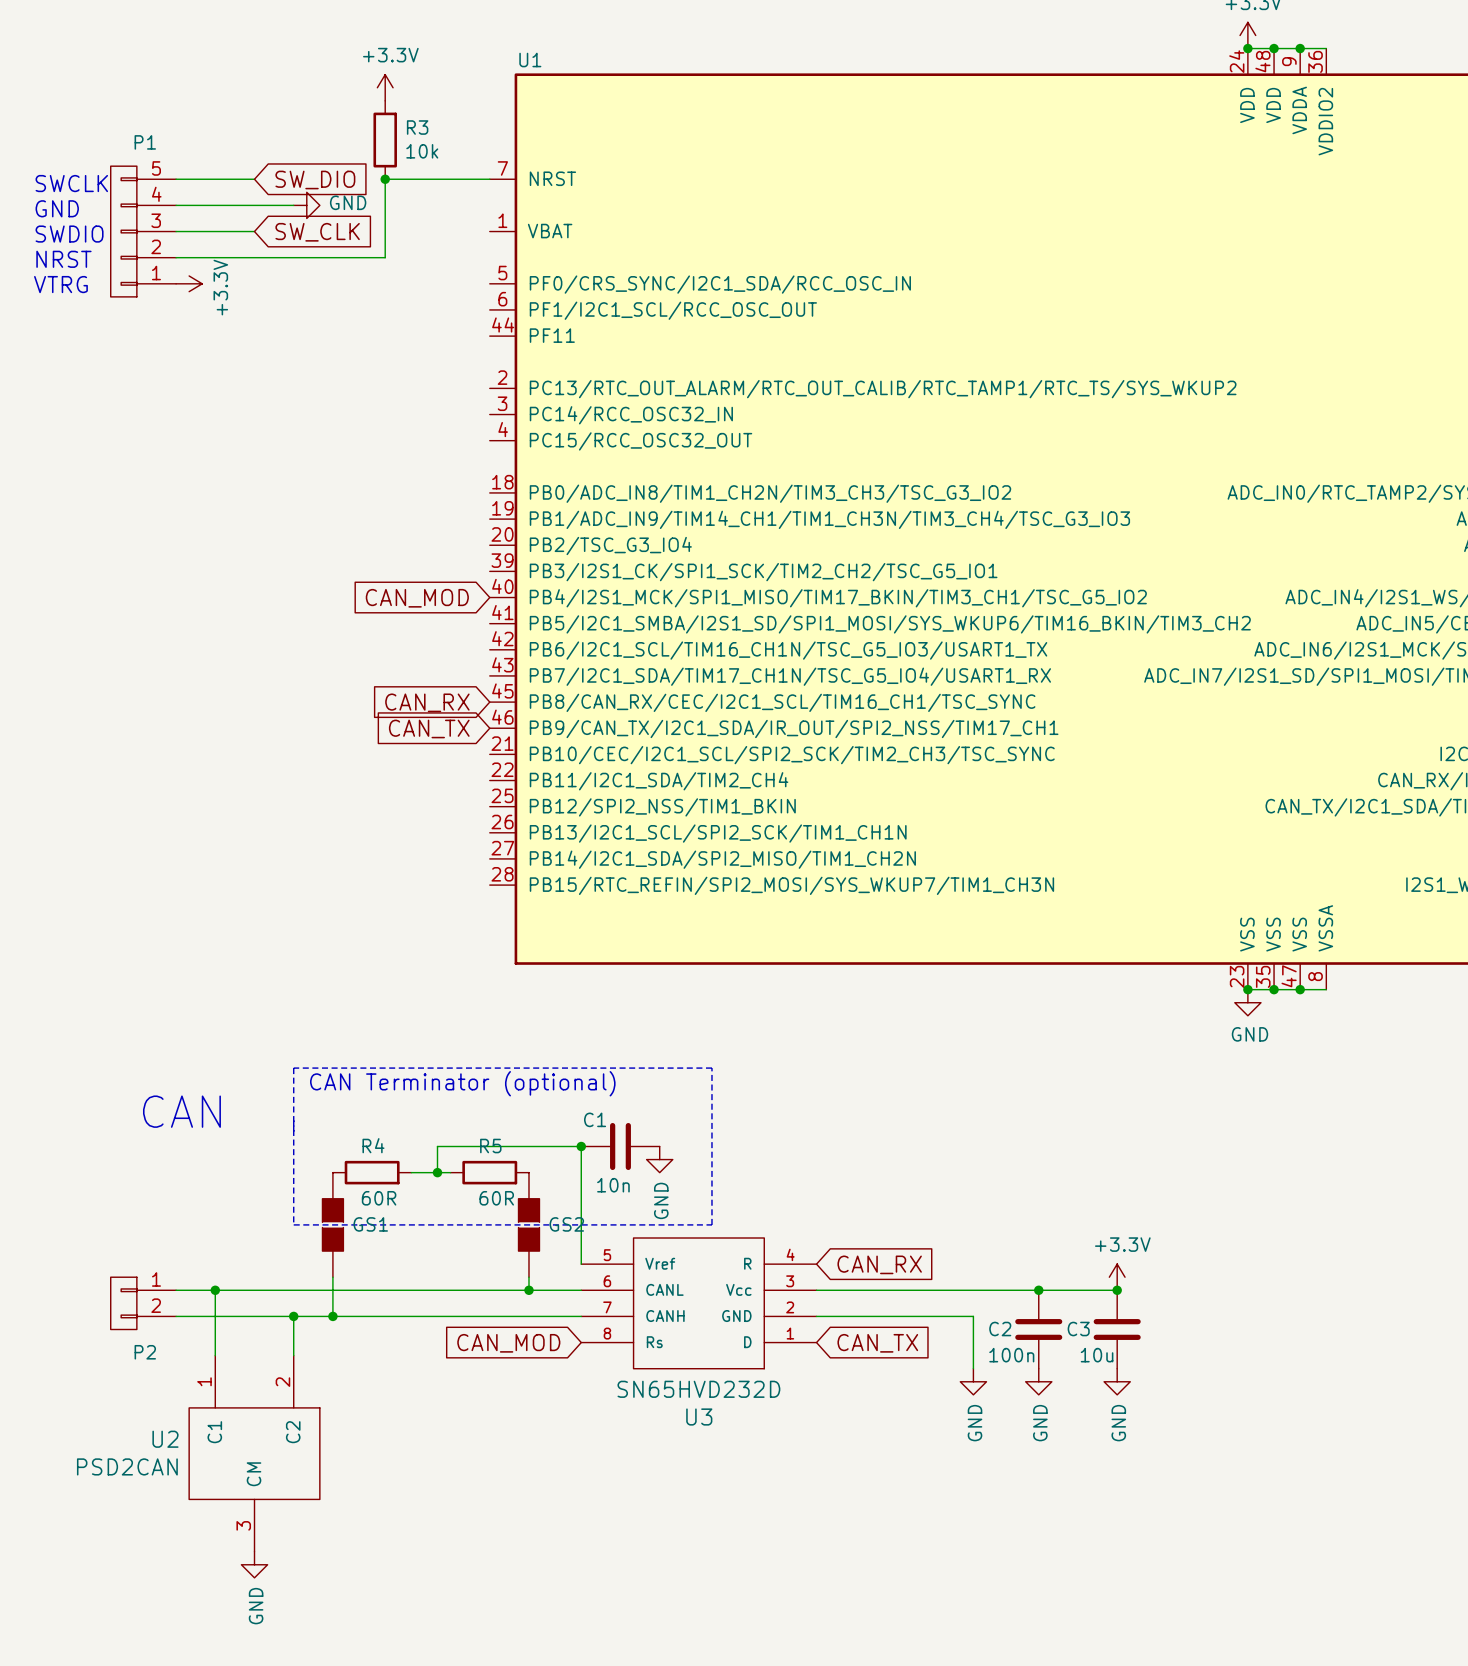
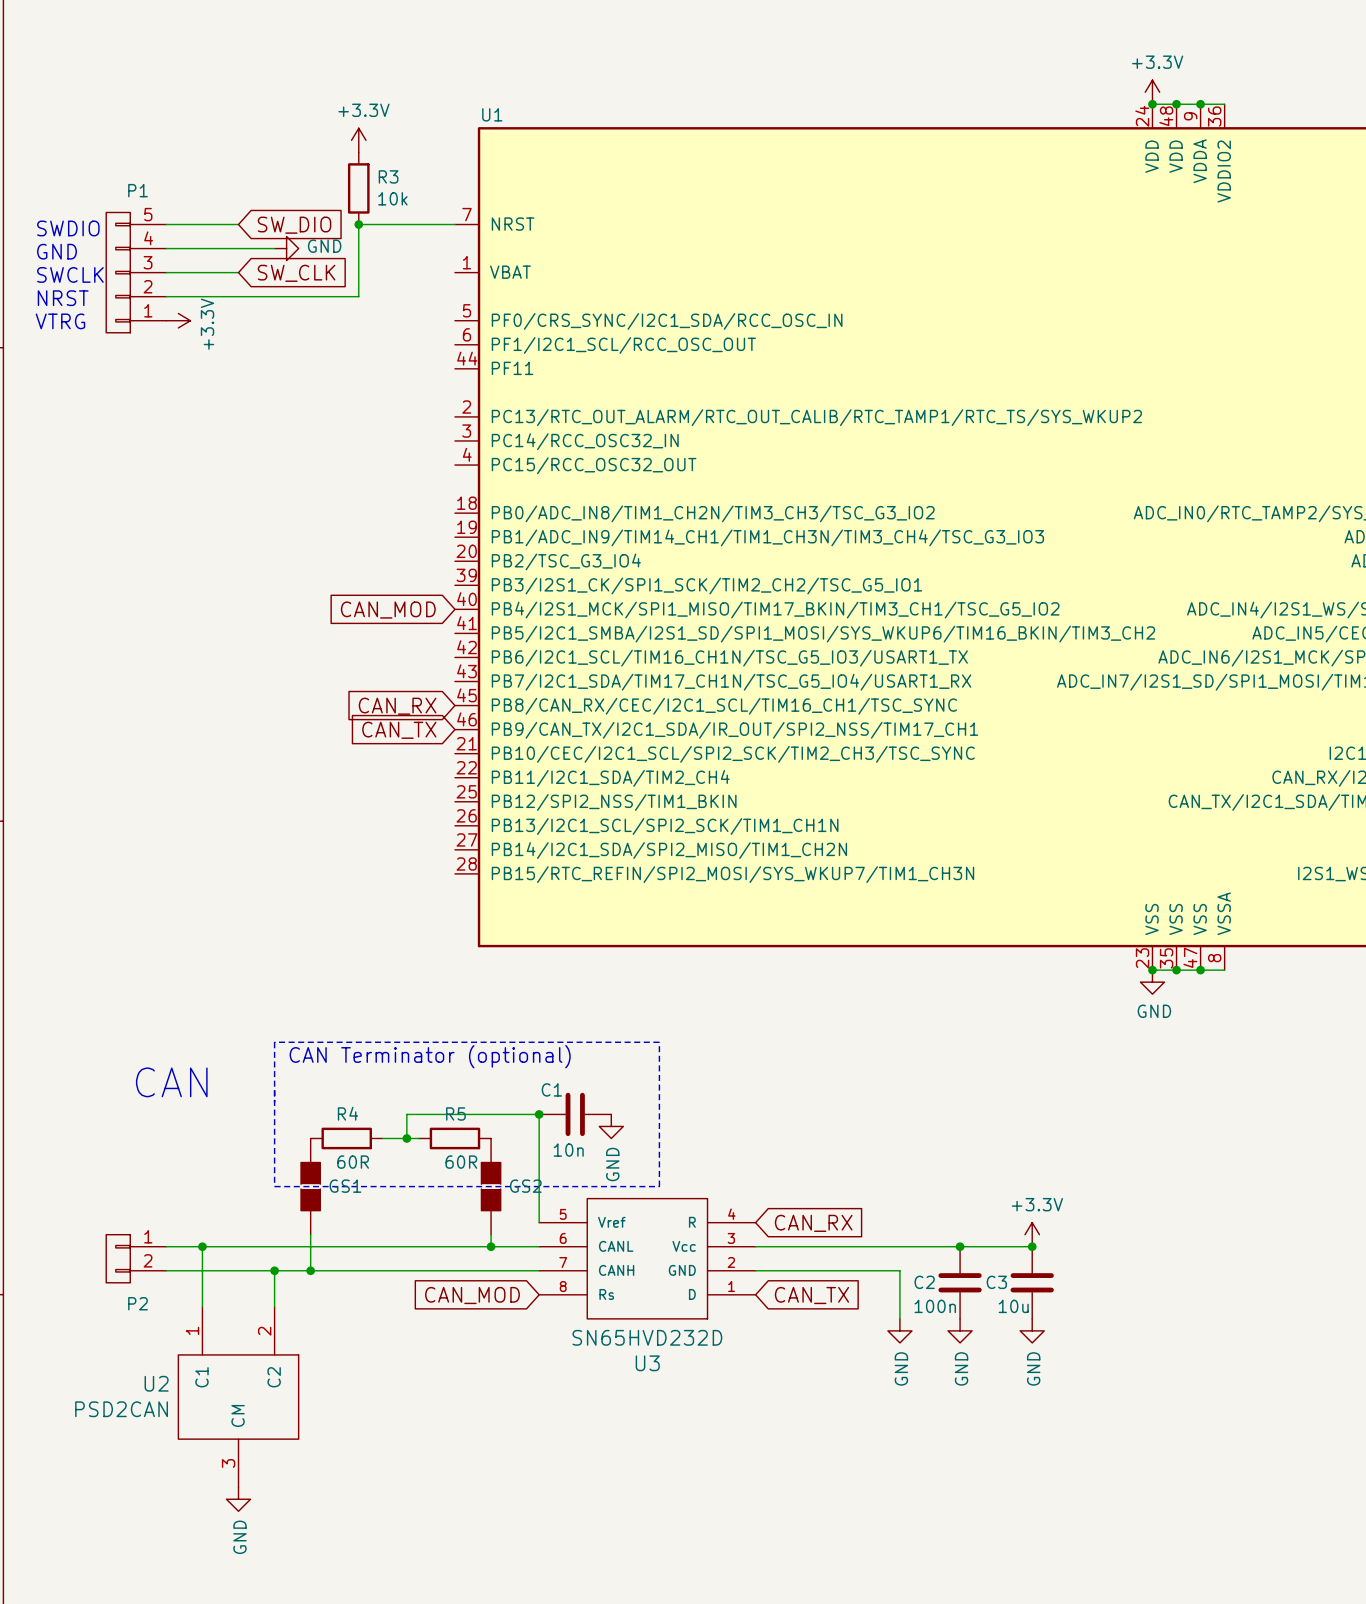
text: SWCLK (71, 183) -> SWDIO (68, 228)
text: SWDIO (69, 234) -> SWCLK (70, 274)

